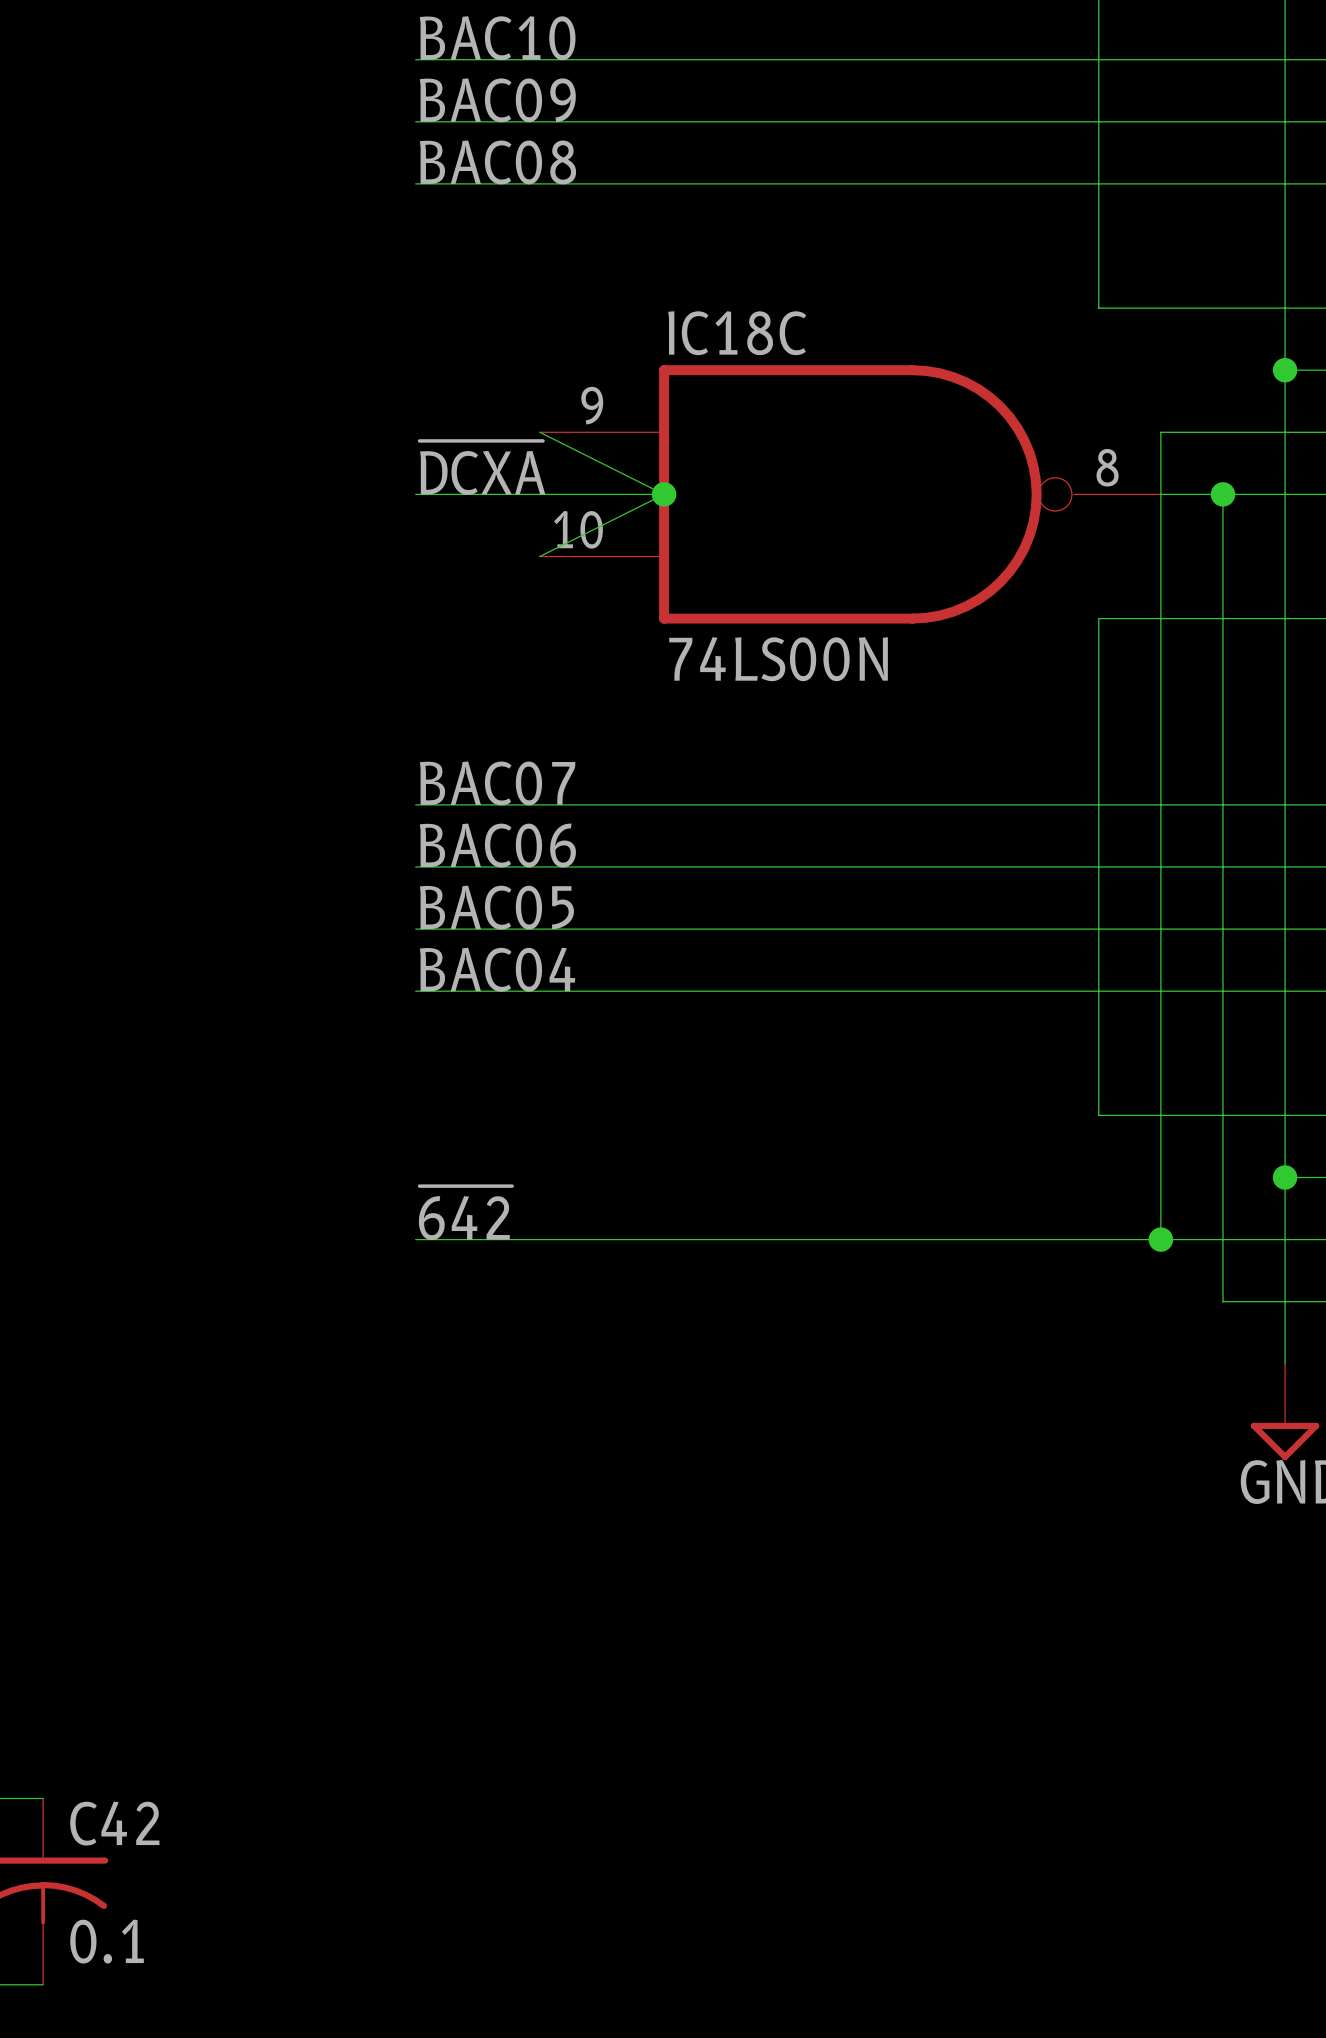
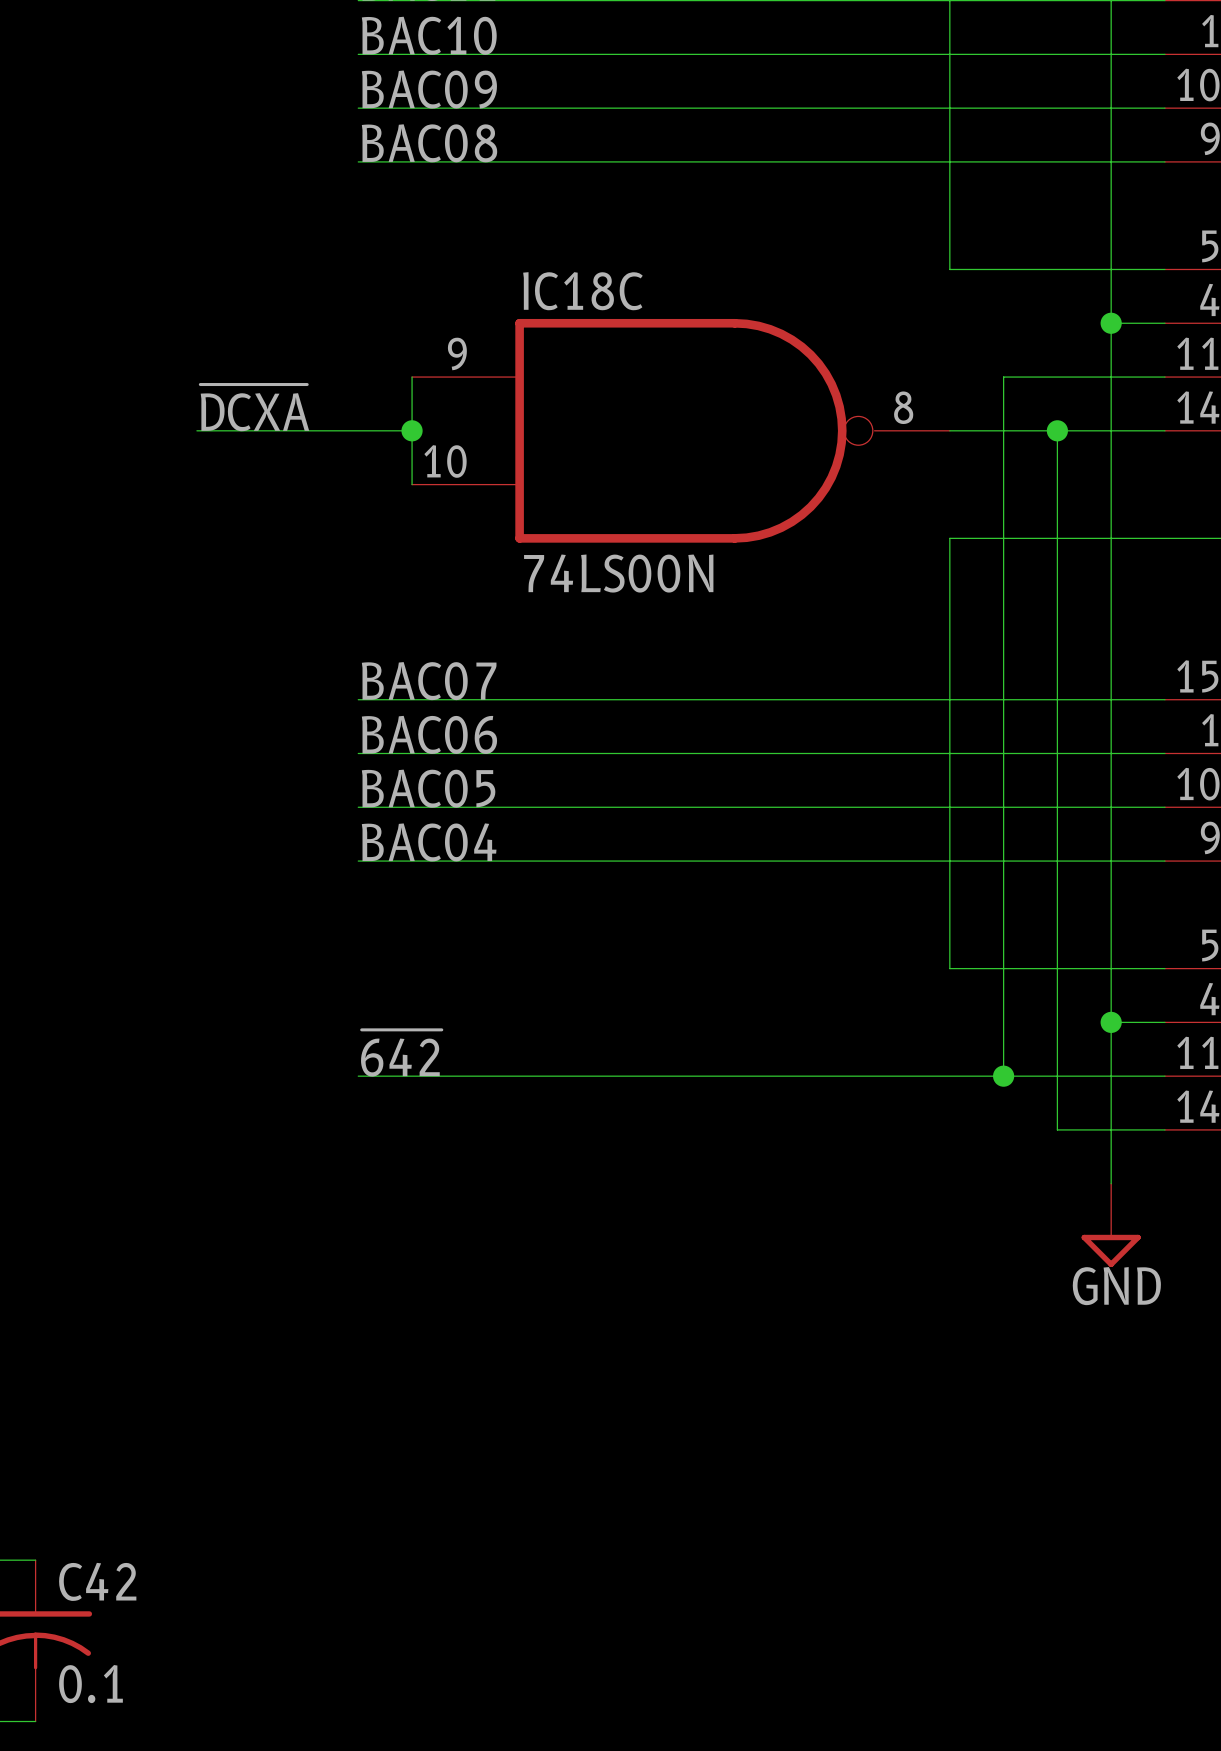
wire: none -> (412, 377) (412, 484)
wire: (539, 432) (664, 494) -> none
label position: ~{DCXA} (482, 467) -> ~{DCXA} (254, 407)
wire: (477, 494) (664, 494) -> (196, 430) (358, 430)
junction: none -> (412, 430)
wire: (664, 494) (539, 556) -> none
junction: (664, 494) -> none
IC18C position: (850, 494) -> (680, 430)

